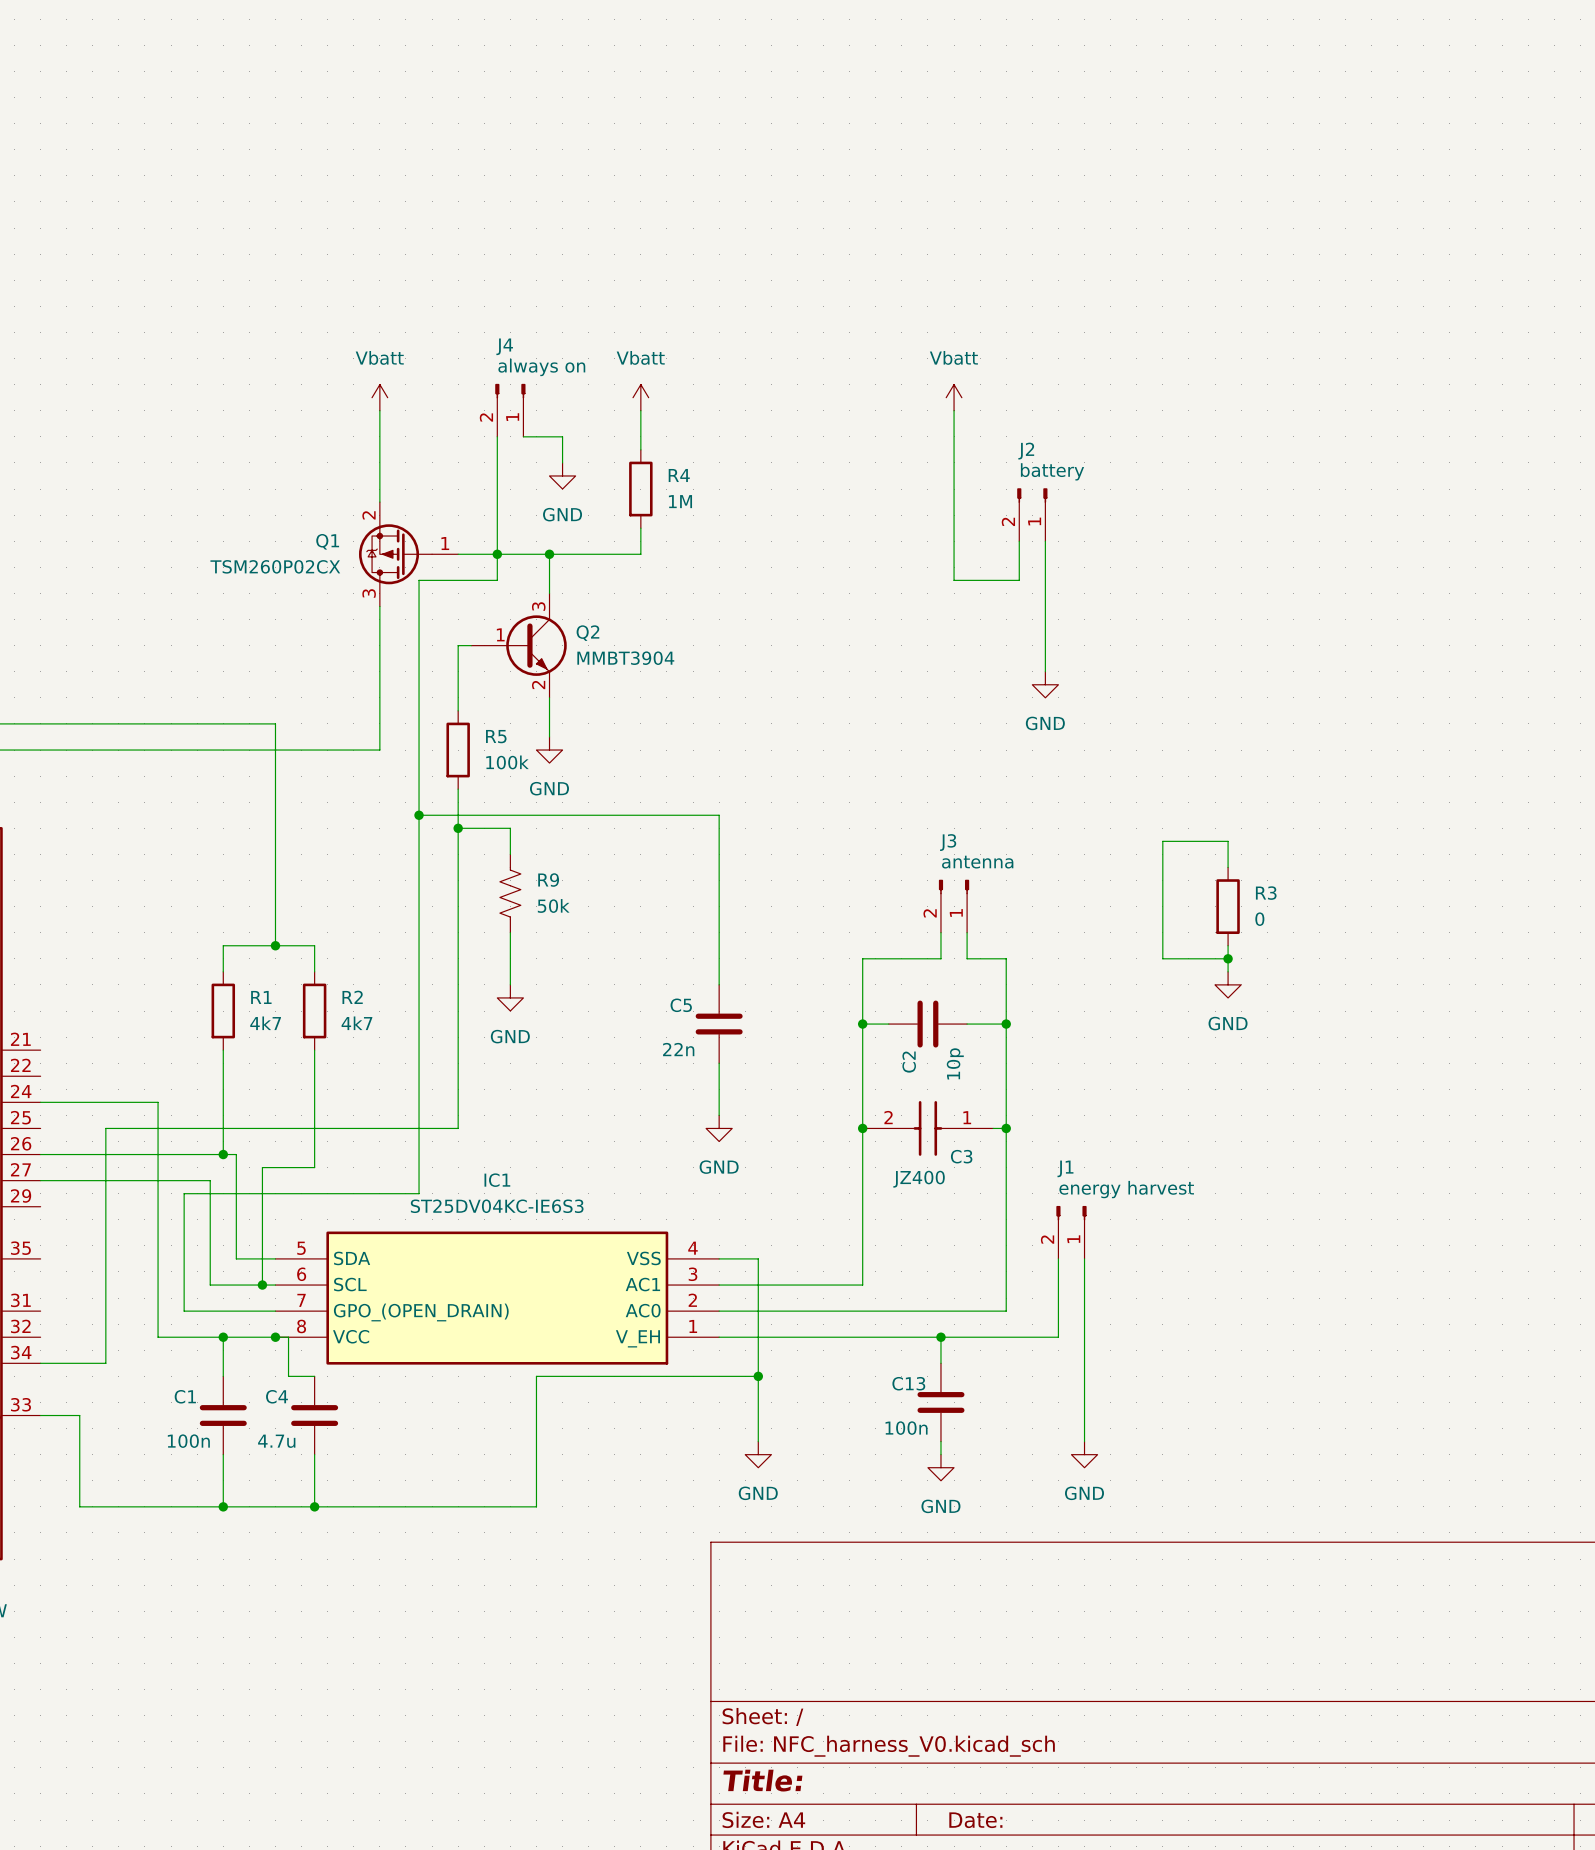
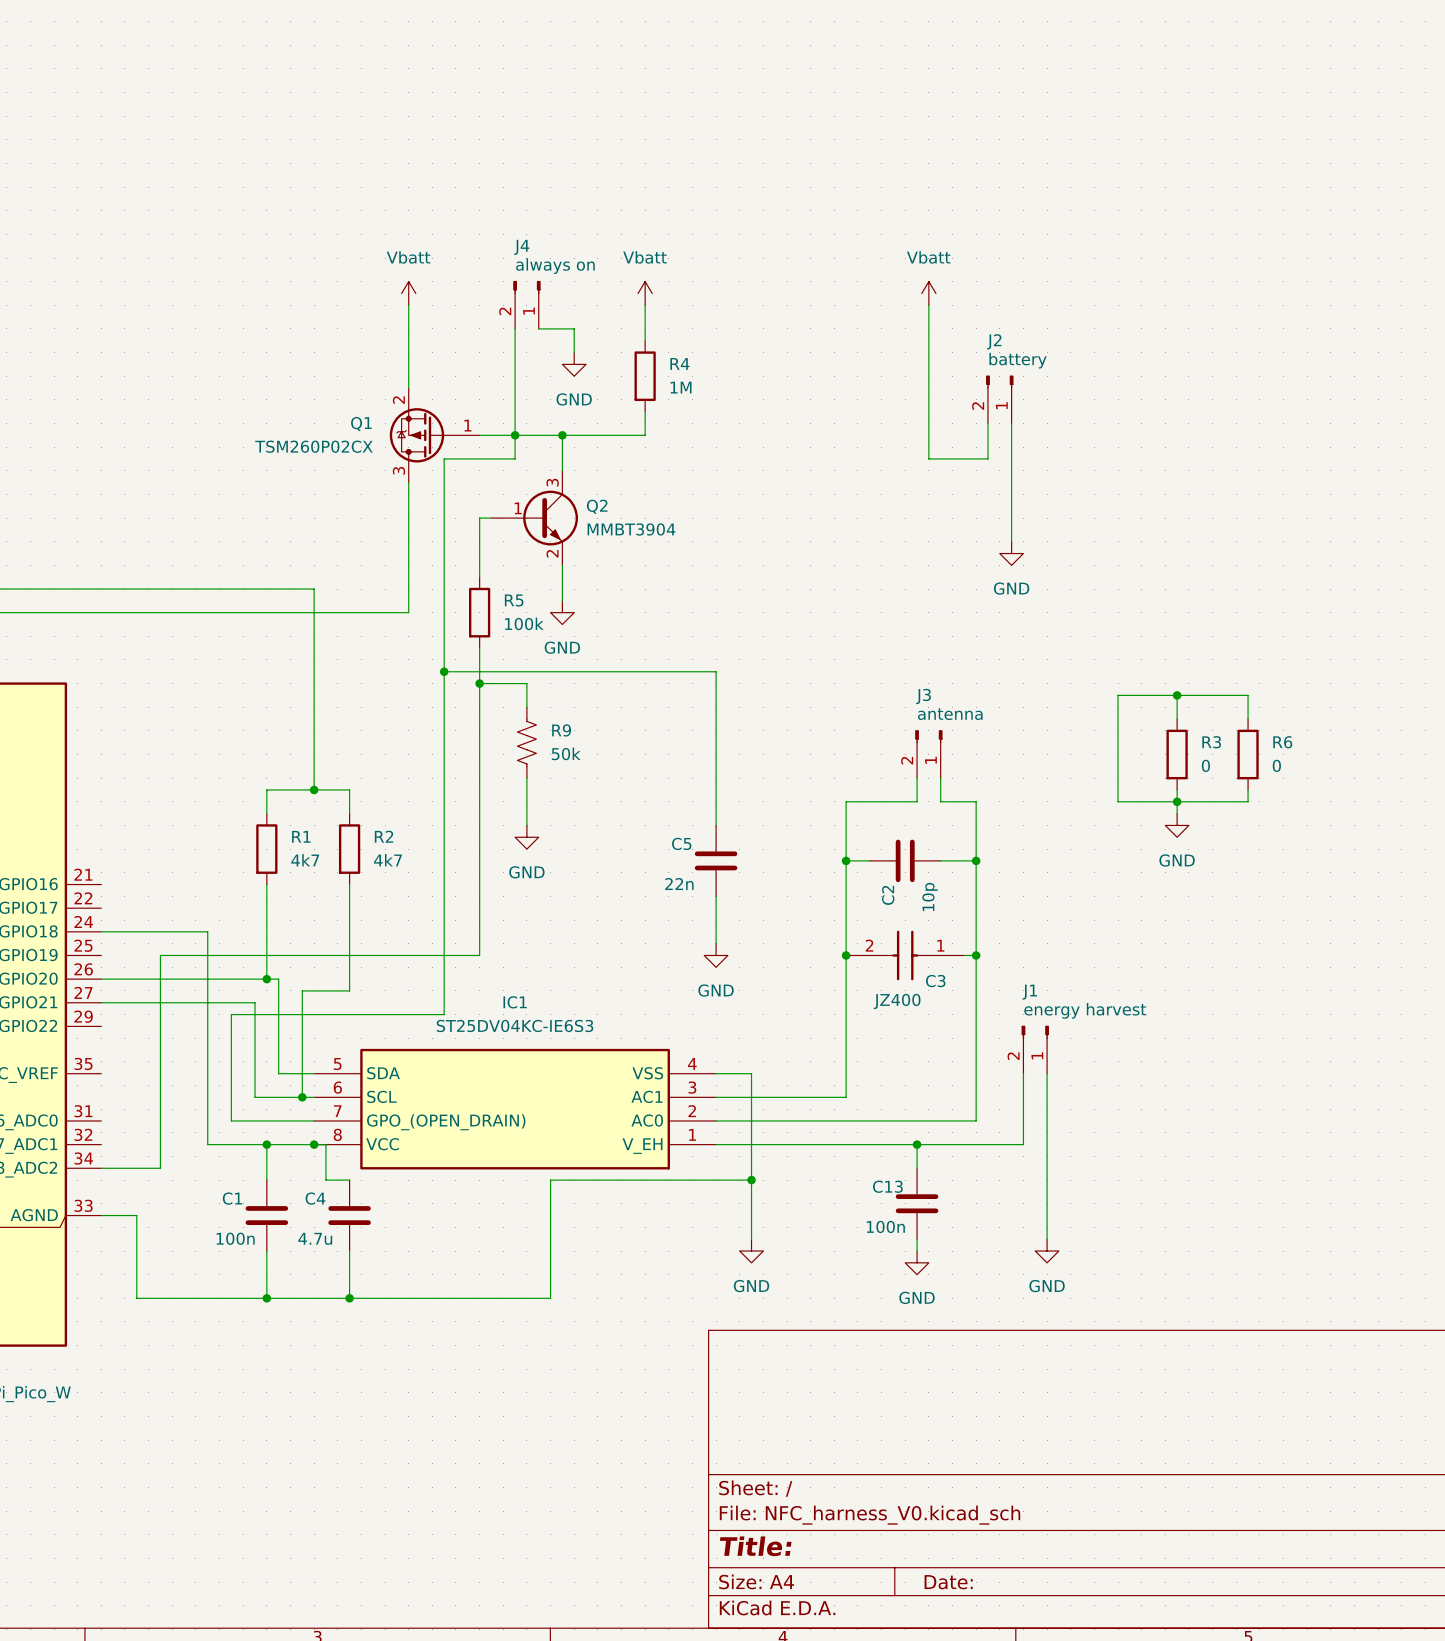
wire: none -> (1177, 695) (1248, 695) (1248, 719)
junction: none -> (1177, 695)
R6: none -> 0 (1248, 754)
wire: none -> (1248, 789) (1248, 801) (1177, 801)

